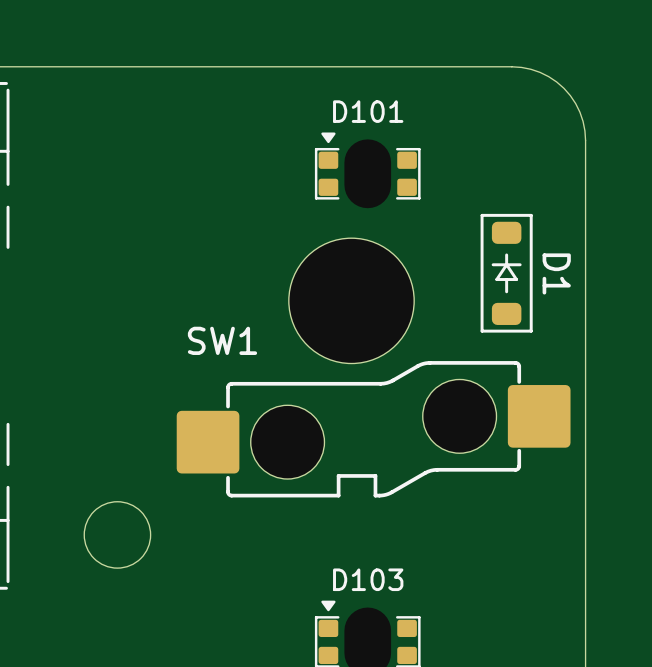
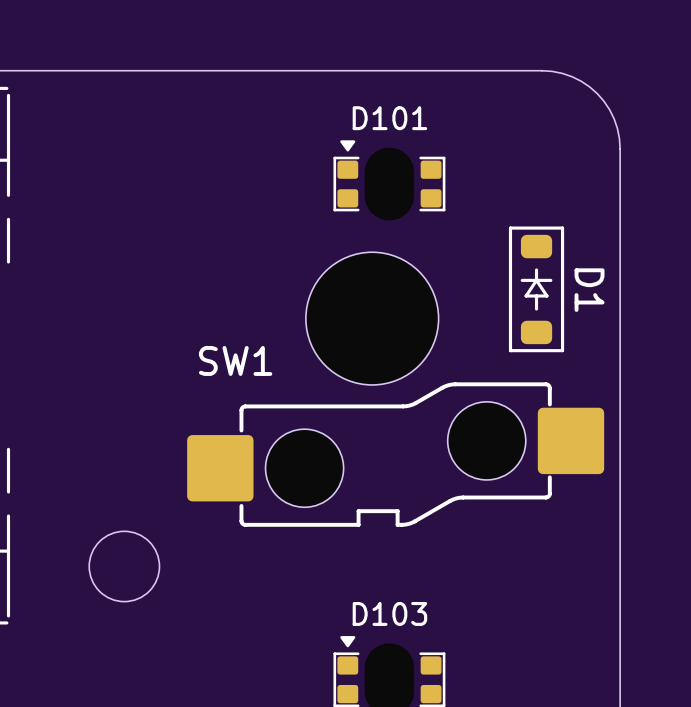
SW1 footprint: [176, 238, 571, 498] -> [187, 252, 605, 527]

